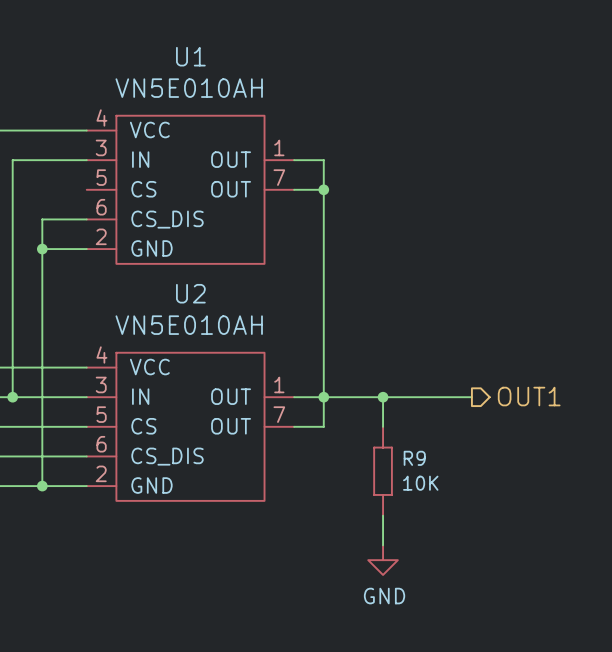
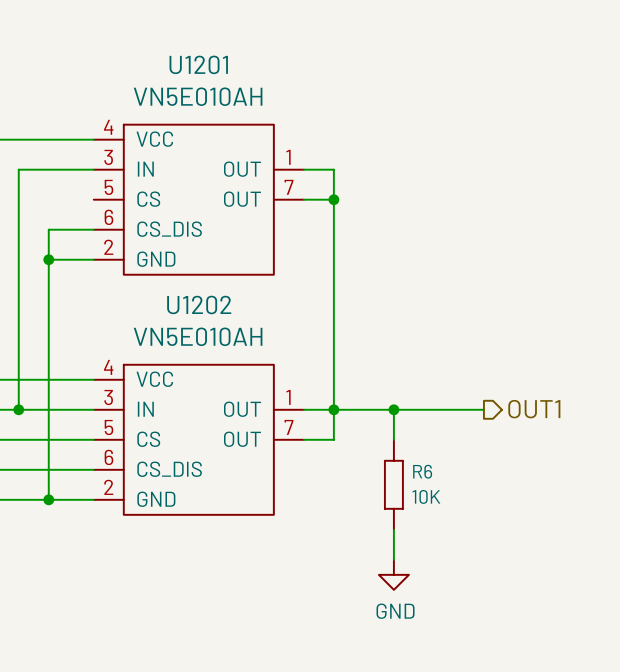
U1 name: U1 (190, 56) -> U1201 (198, 64)
U2 name: U2 (190, 293) -> U1202 (199, 304)
R9 name: R9 (414, 458) -> R6 (422, 471)

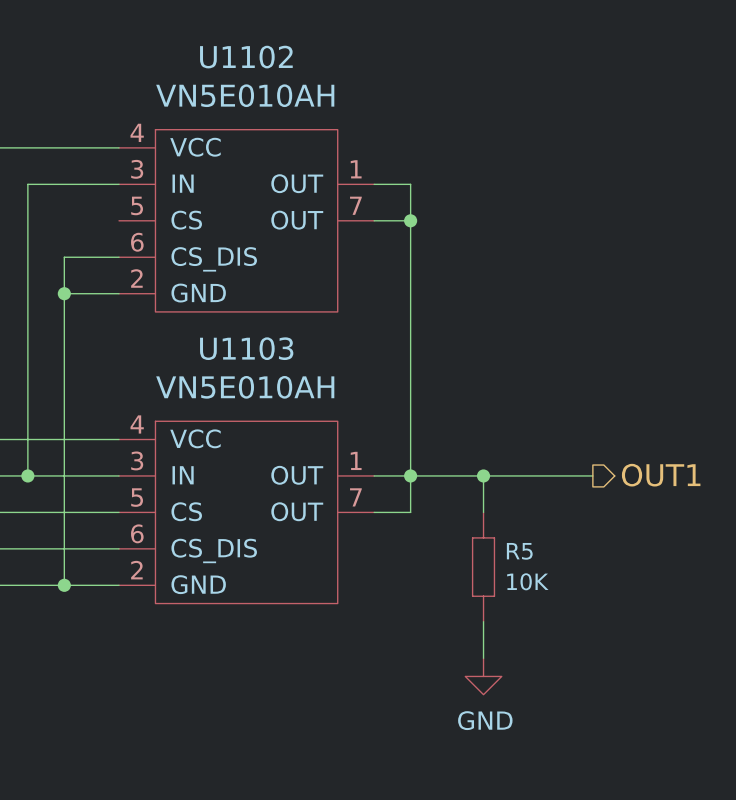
U1201 name: U1201 (198, 64) -> U1102 (246, 57)
U1202 name: U1202 (199, 304) -> U1103 (246, 348)
R6 name: R6 (422, 471) -> R5 (519, 551)

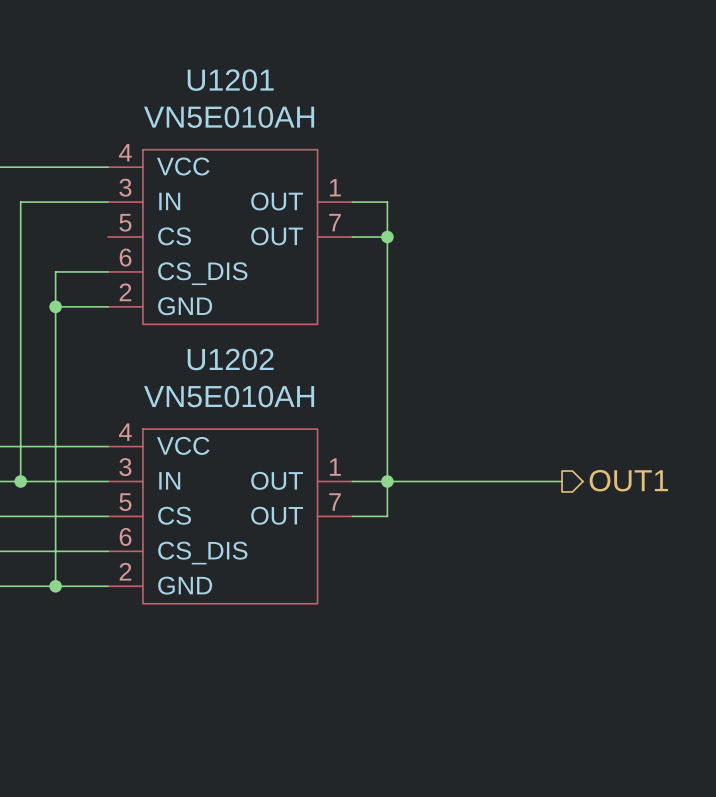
U1102 name: U1102 (246, 57) -> U1201 (230, 80)
U1103 name: U1103 (246, 348) -> U1202 (230, 359)
wire: (483, 475) (483, 512) -> none
junction: (483, 475) -> none
R5: 10K (483, 567) -> none
wire: (483, 621) (483, 658) -> none
power symbol: GND (483, 676) -> none

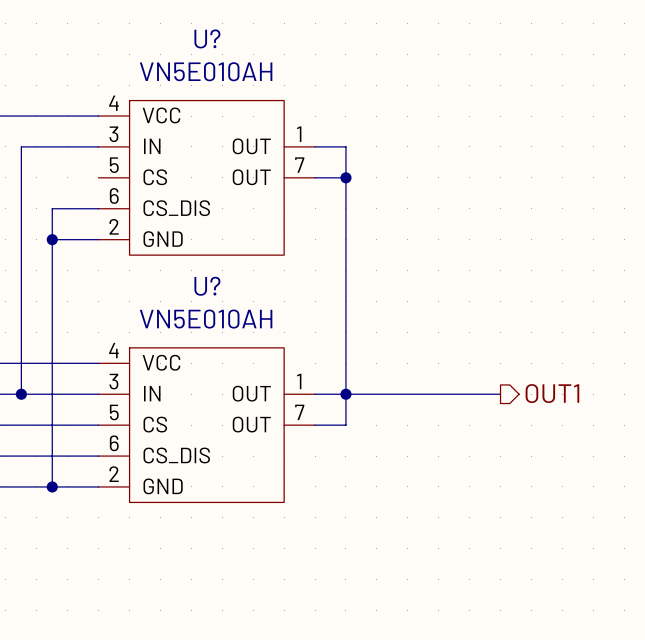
U1201 name: U1201 (230, 80) -> U? (207, 38)
U1202 name: U1202 (230, 359) -> U? (207, 286)

